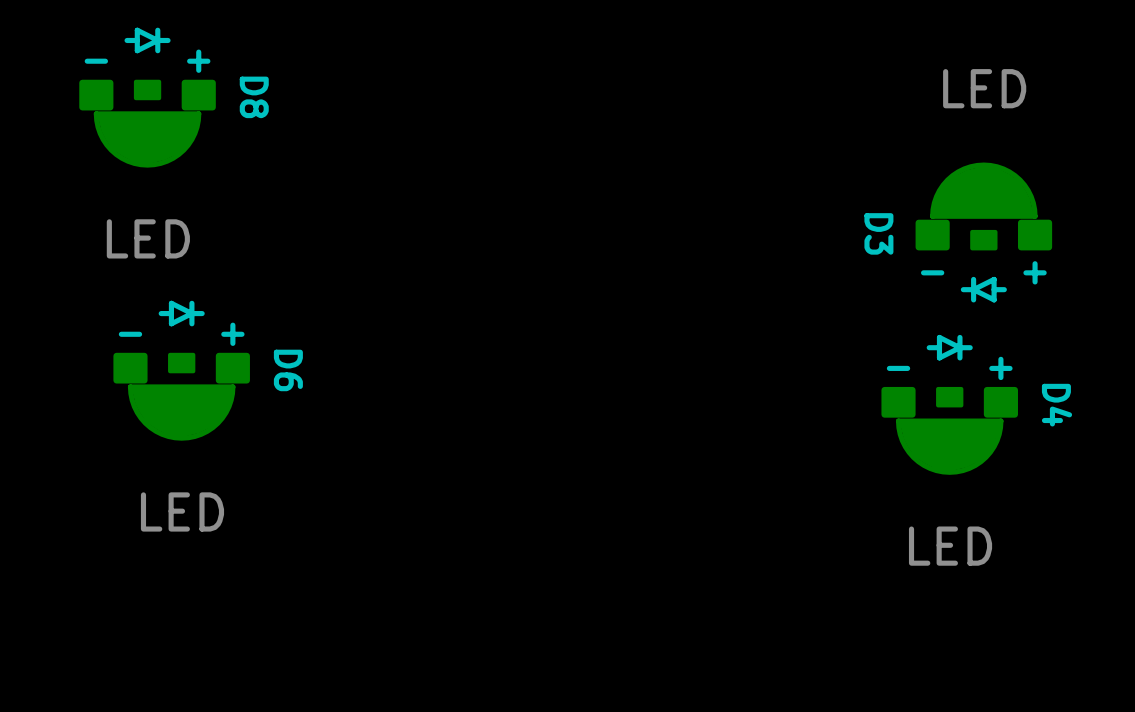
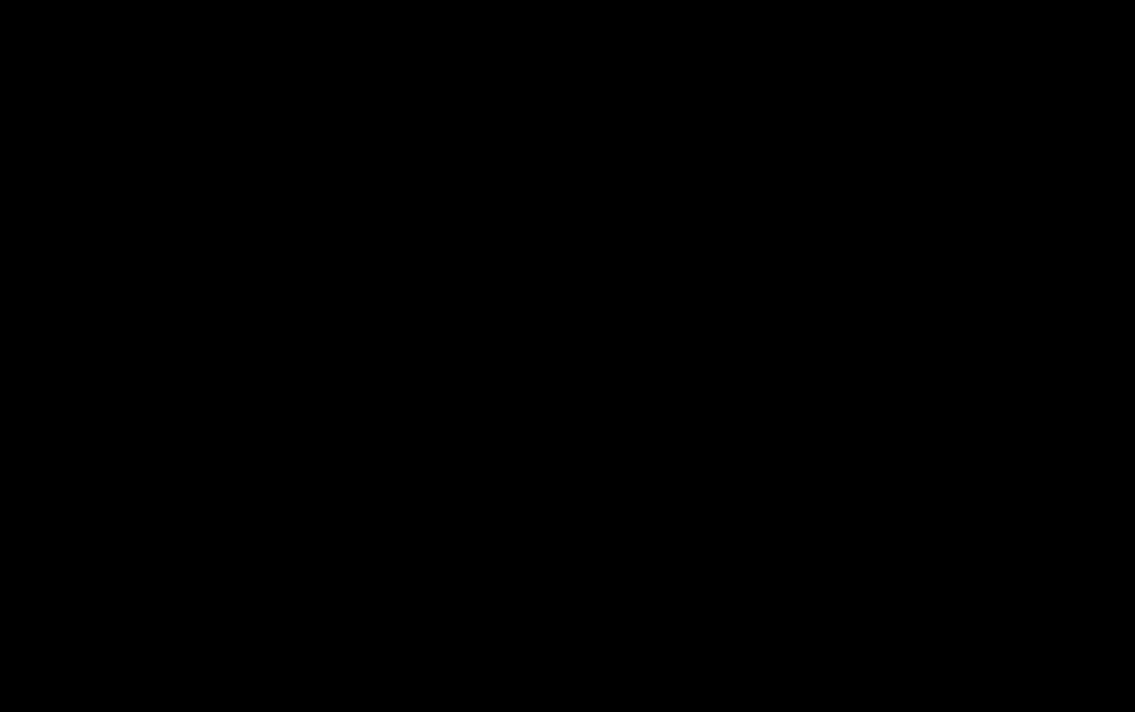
D8: LED (147, 97) -> none
D3: LED (983, 232) -> none
D6: LED (181, 370) -> none
D4: LED (949, 404) -> none

